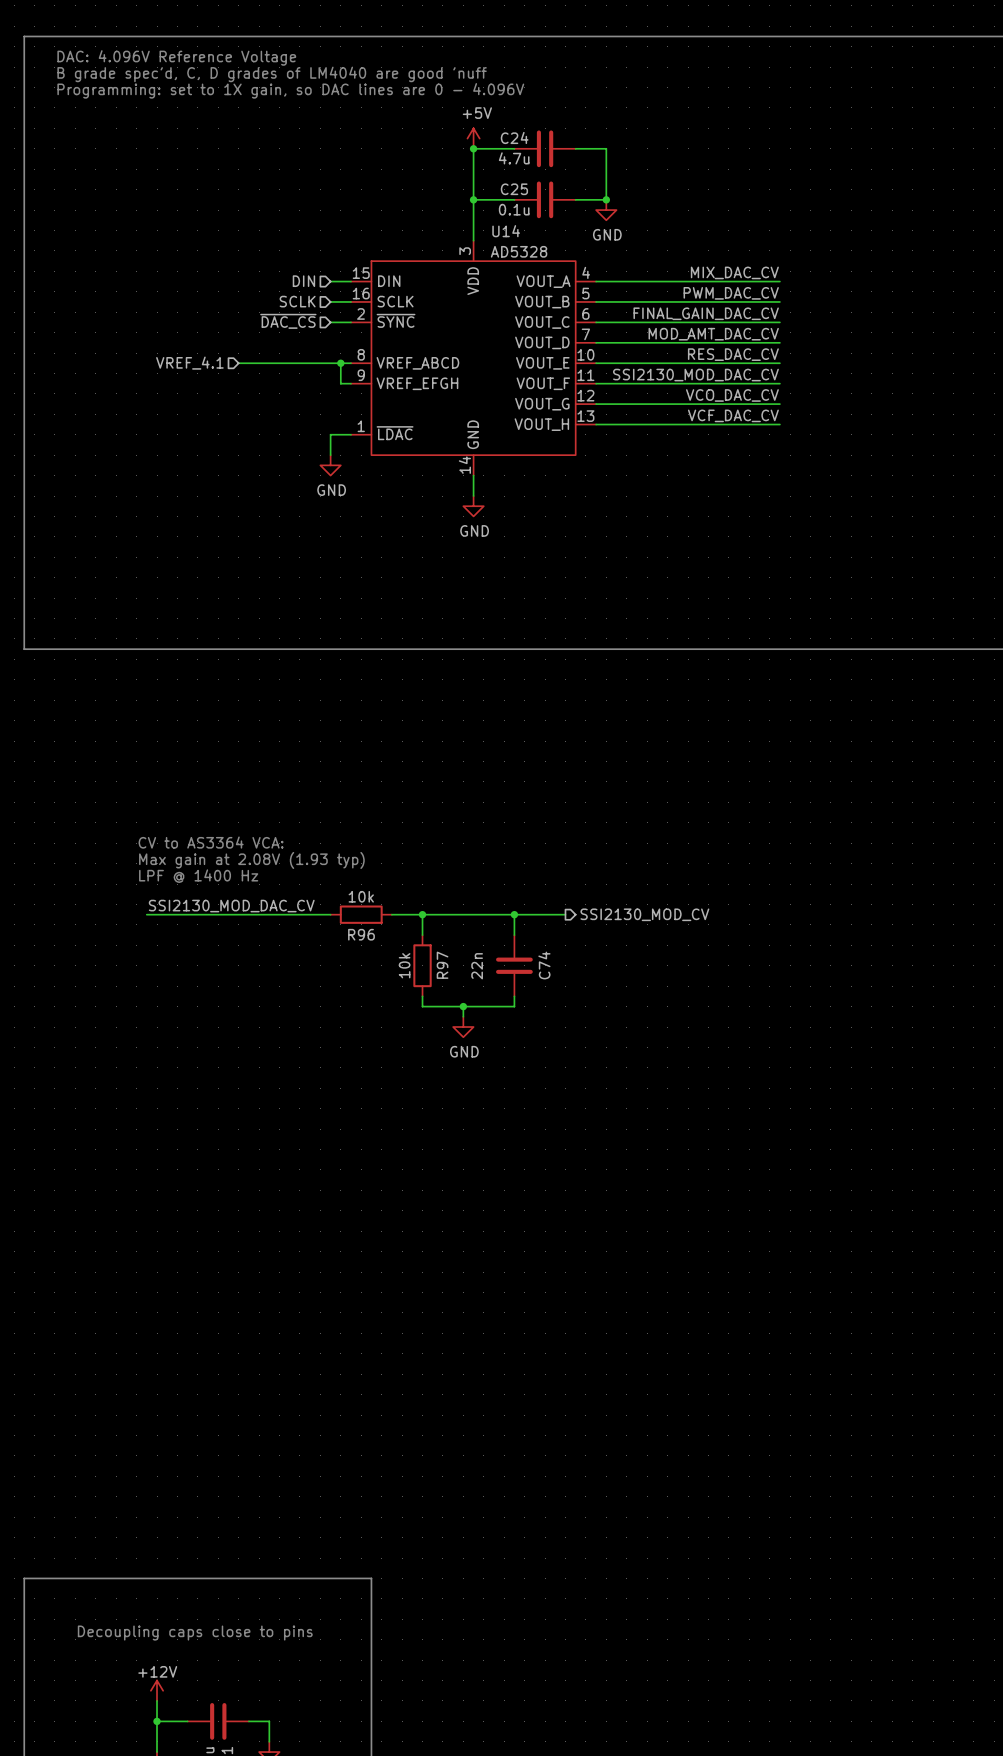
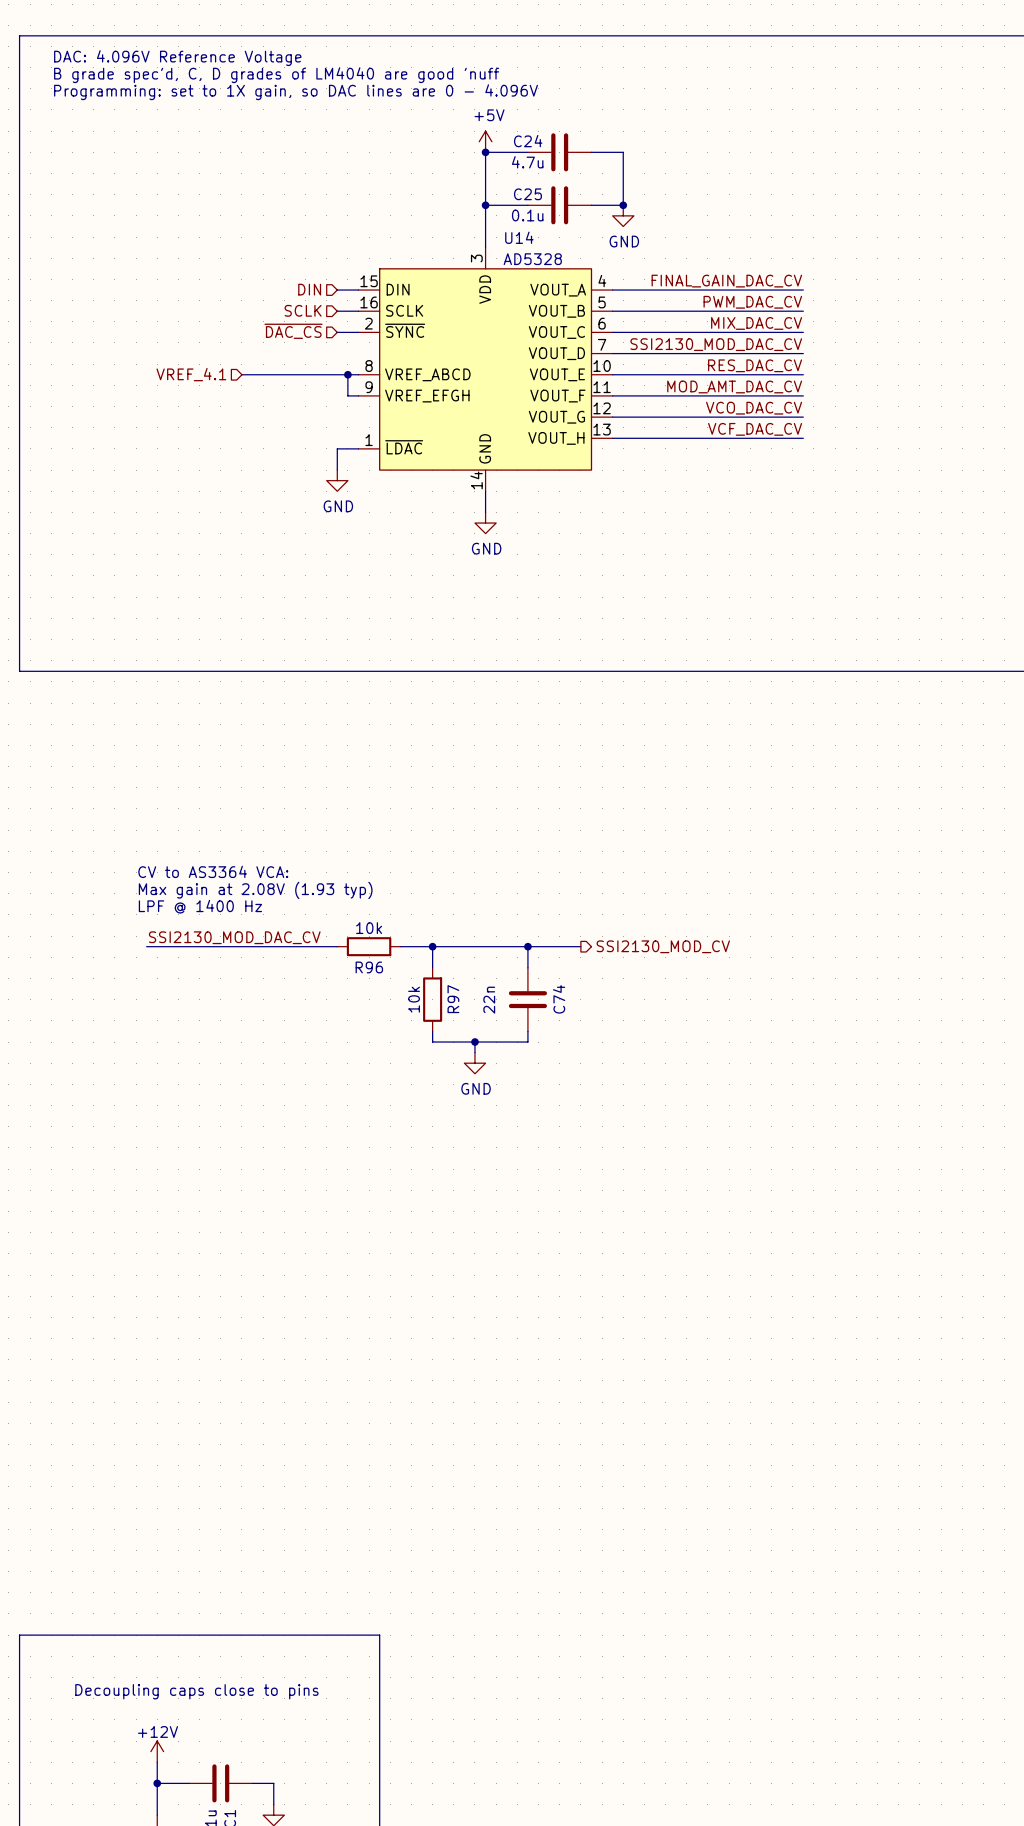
label: MIX_DAC_CV (734, 272) -> FINAL_GAIN_DAC_CV (726, 281)
label: FINAL_GAIN_DAC_CV (706, 313) -> MIX_DAC_CV (756, 323)
label: MOD_AMT_DAC_CV (713, 334) -> SSI2130_MOD_DAC_CV (716, 344)
label: SSI2130_MOD_DAC_CV (695, 375) -> MOD_AMT_DAC_CV (734, 386)

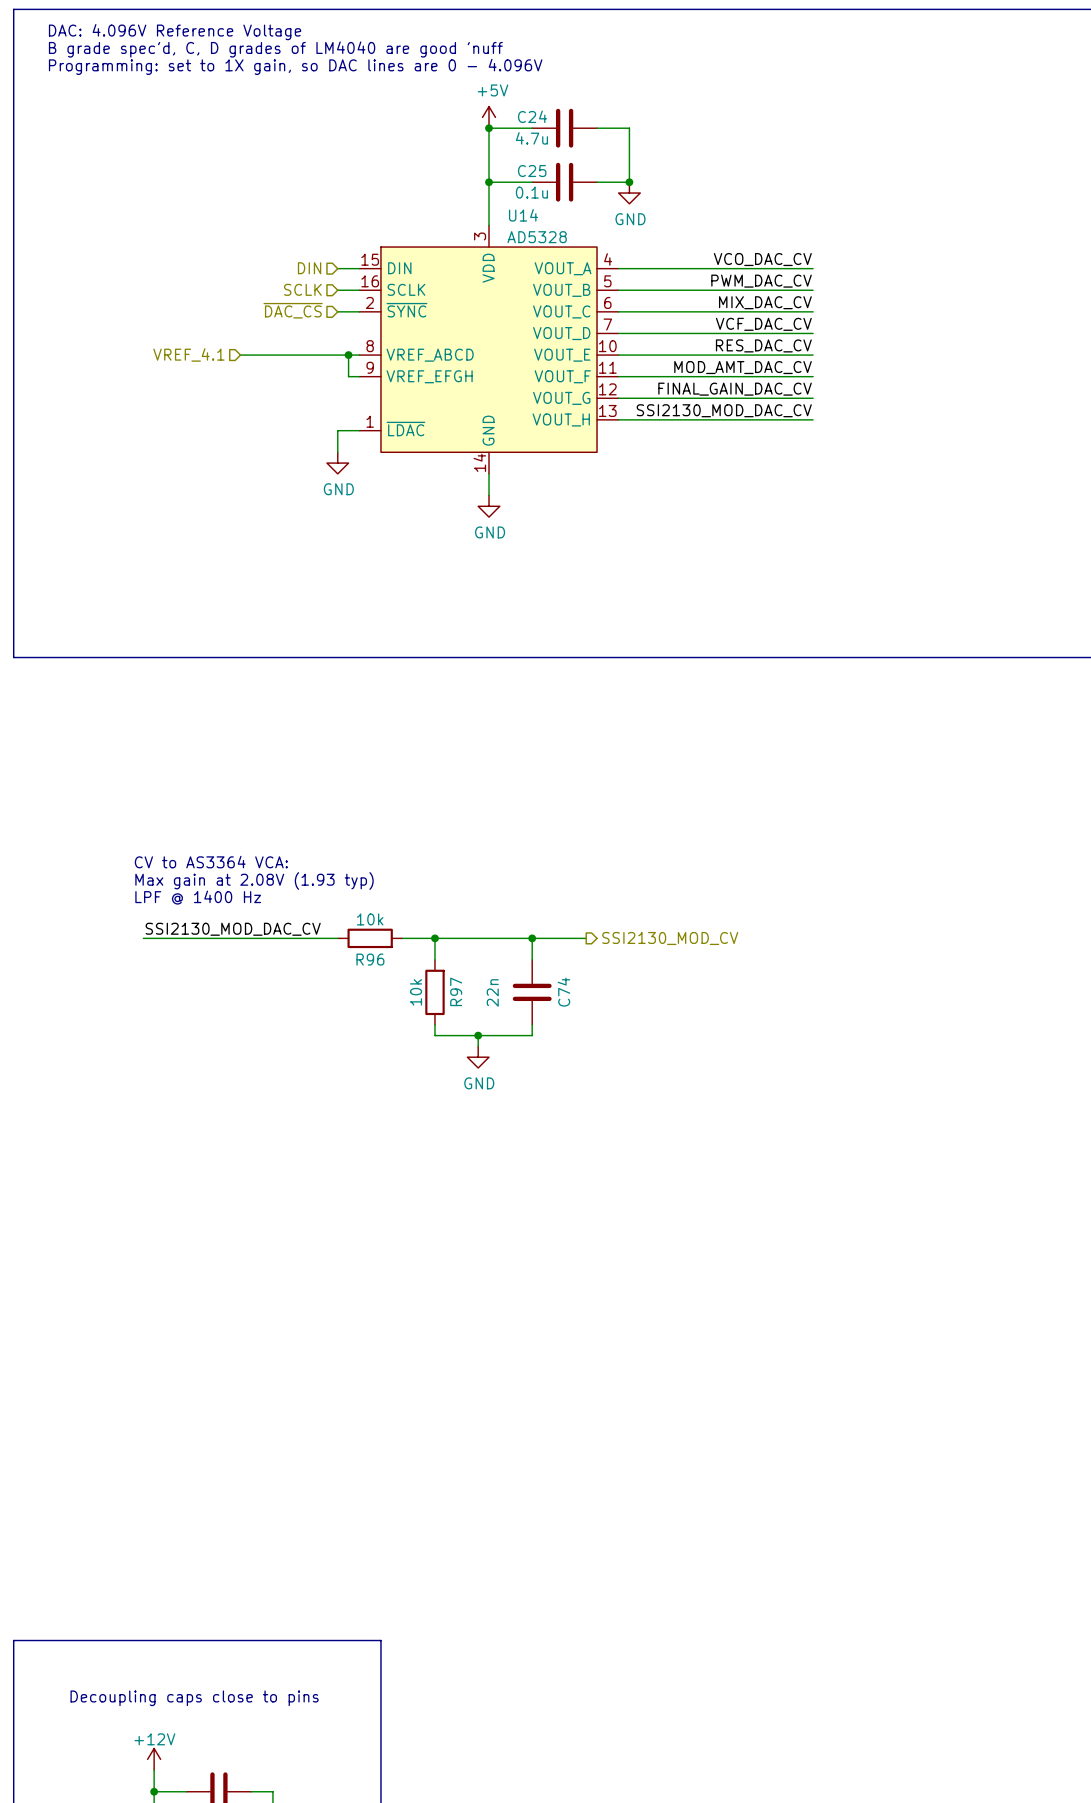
label: FINAL_GAIN_DAC_CV (726, 281) -> VCO_DAC_CV (762, 259)
label: SSI2130_MOD_DAC_CV (716, 344) -> VCF_DAC_CV (763, 324)
label: VCO_DAC_CV (754, 408) -> FINAL_GAIN_DAC_CV (735, 389)
label: VCF_DAC_CV (755, 429) -> SSI2130_MOD_DAC_CV (724, 410)

